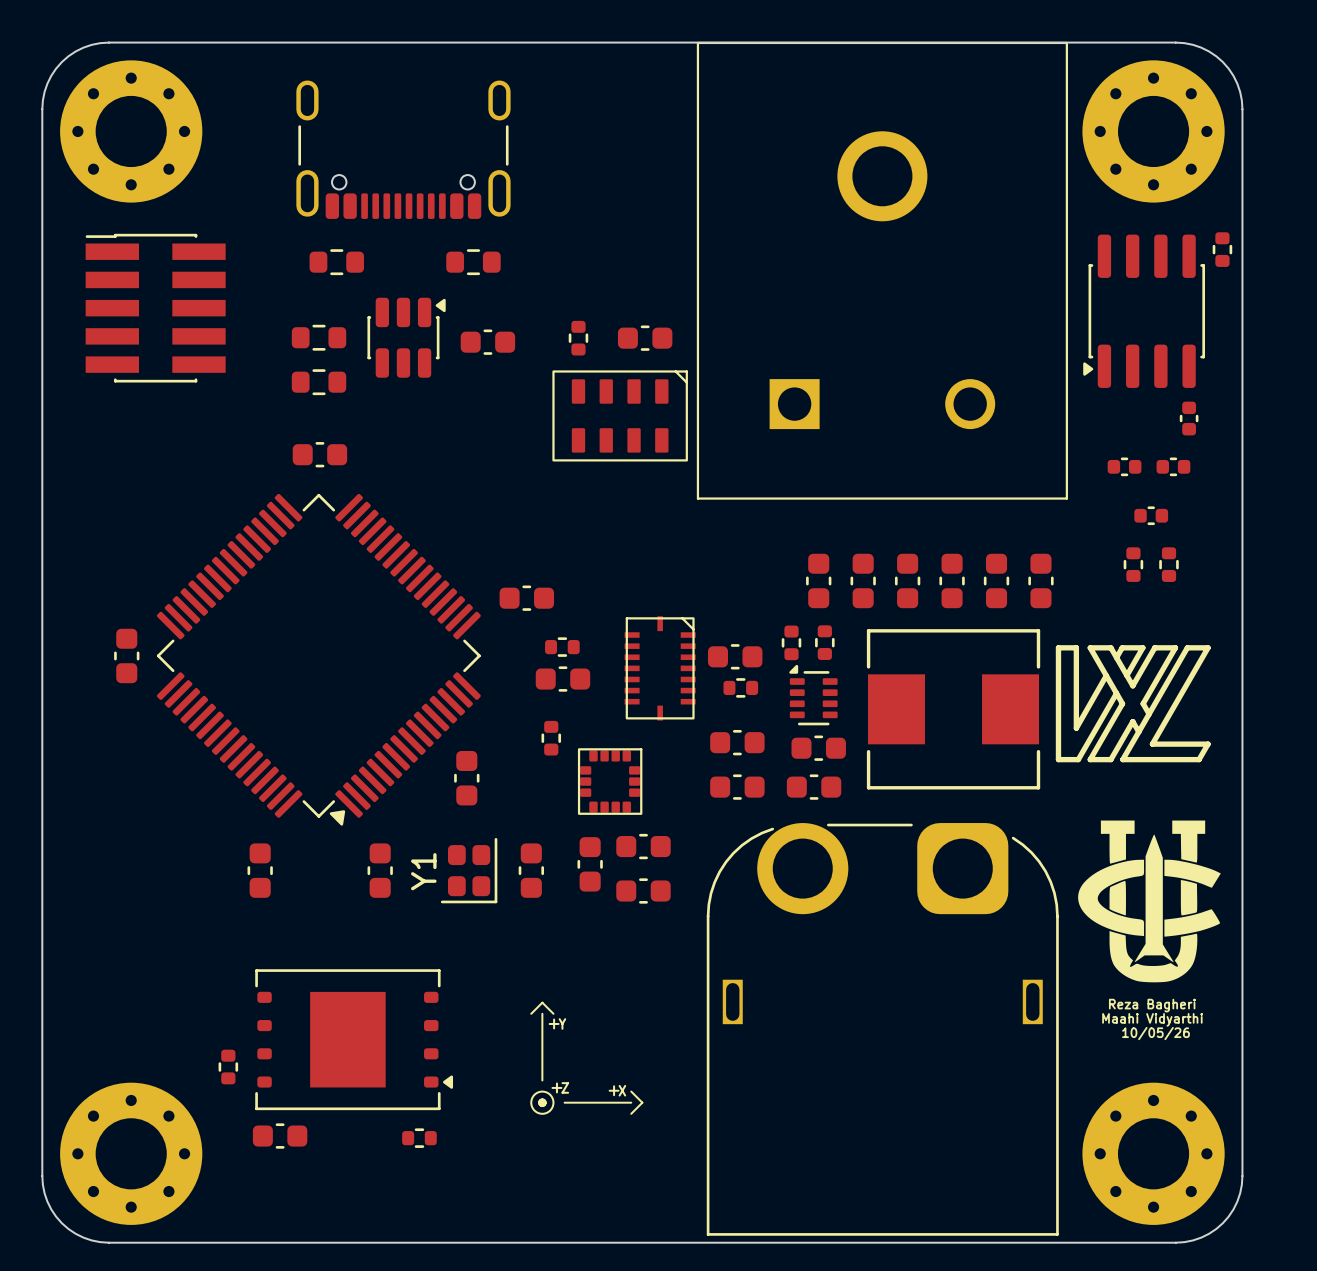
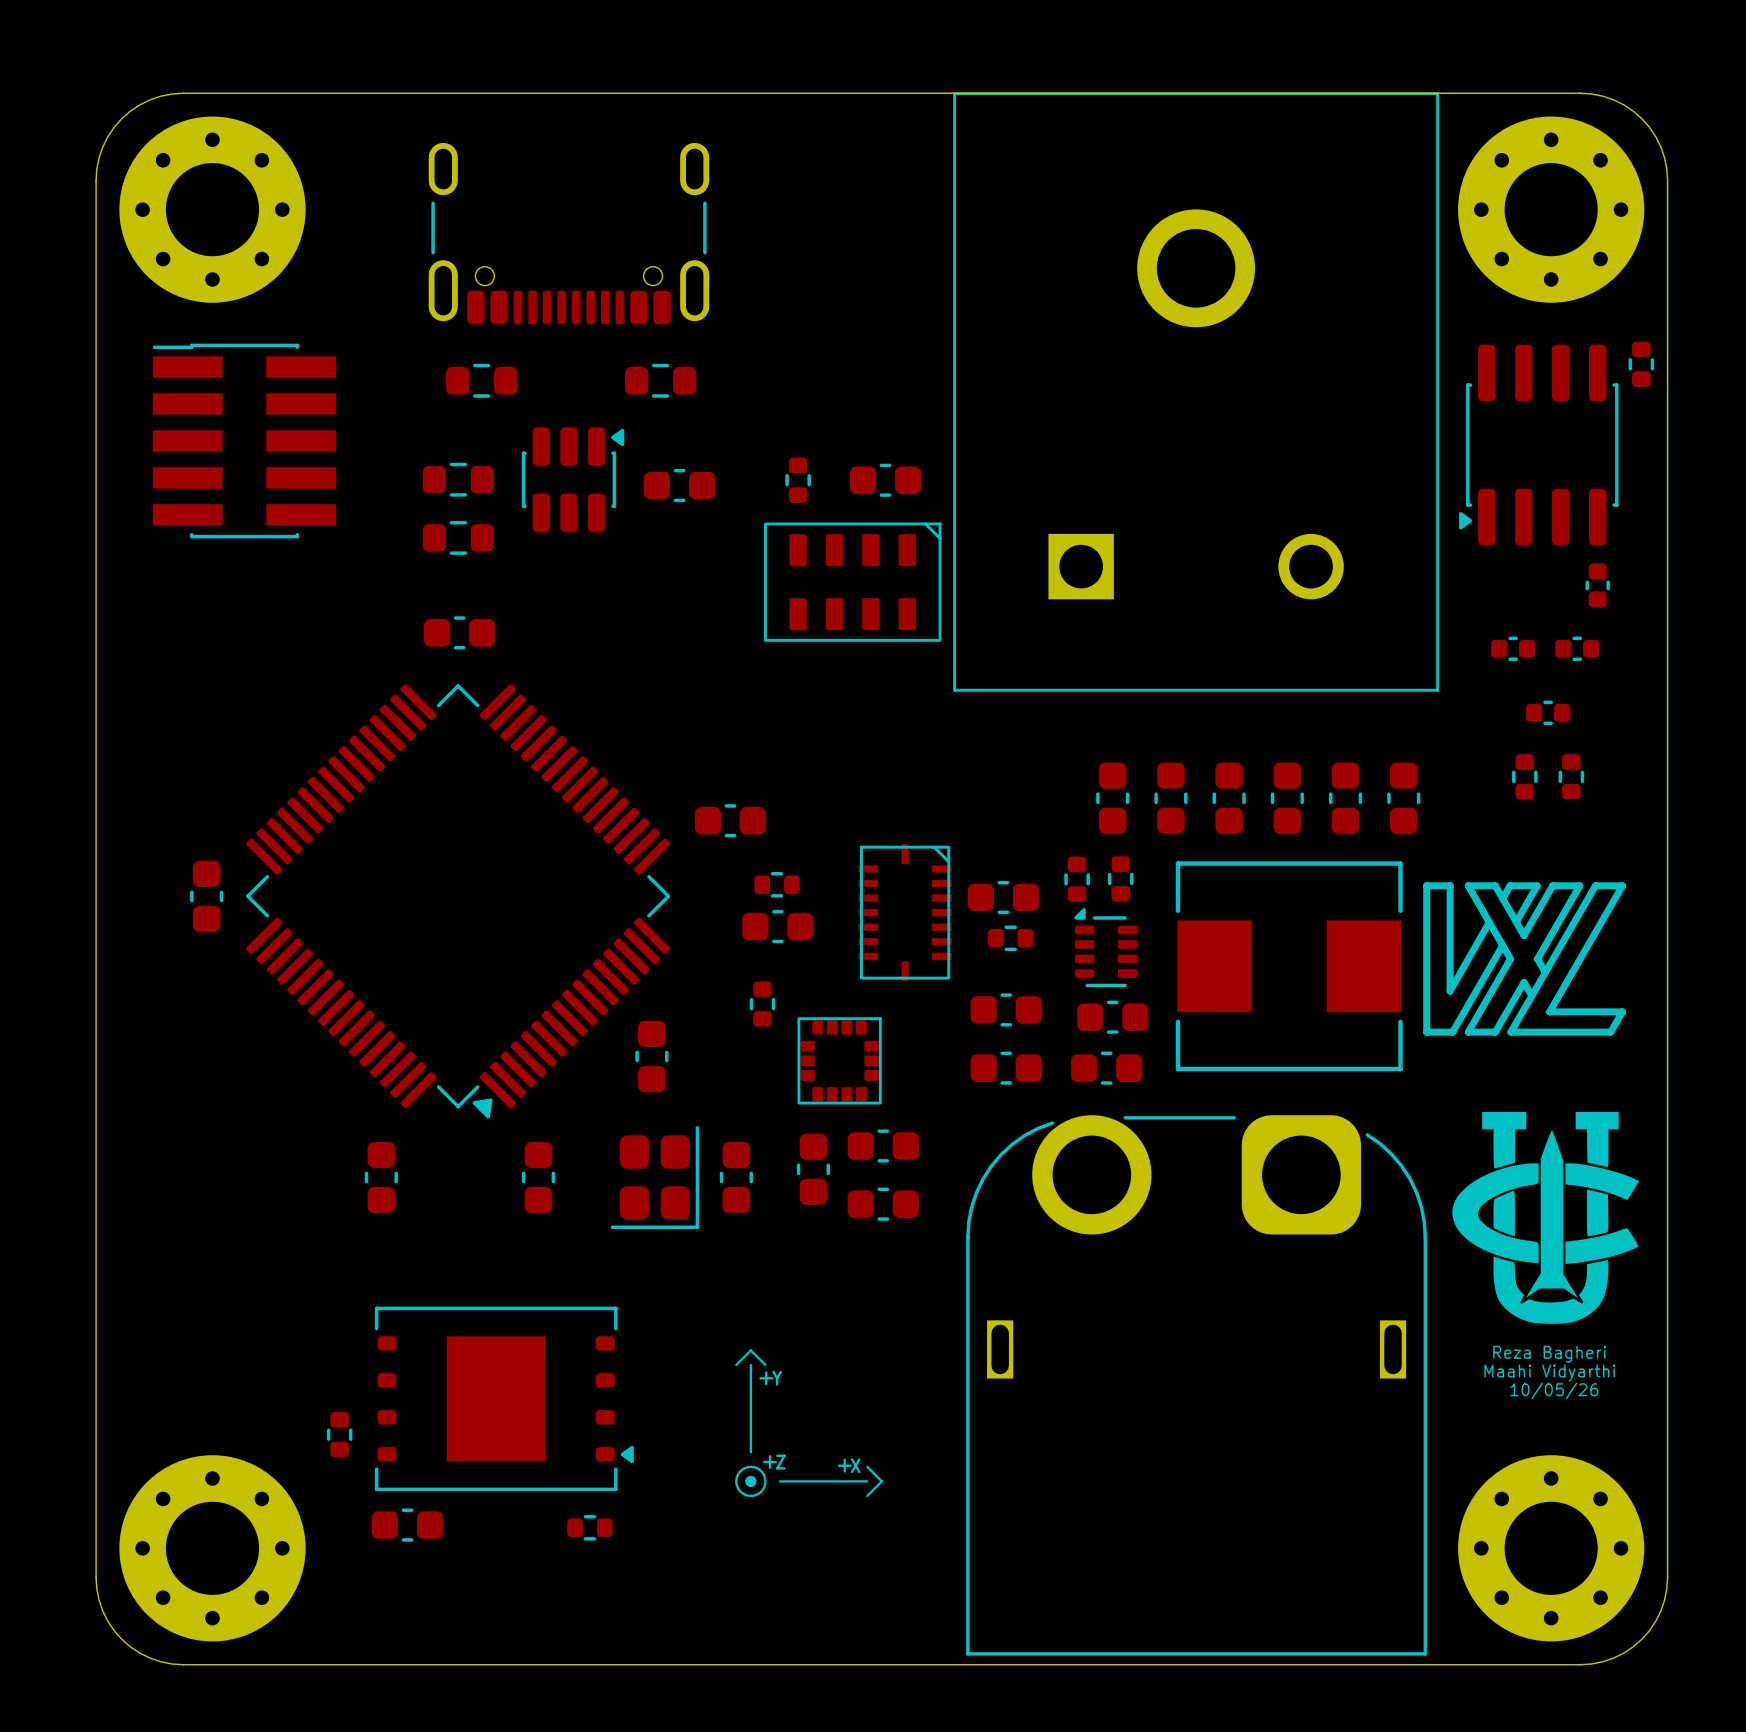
Y1: (469, 870) -> none
part: none -> (654, 1177)

